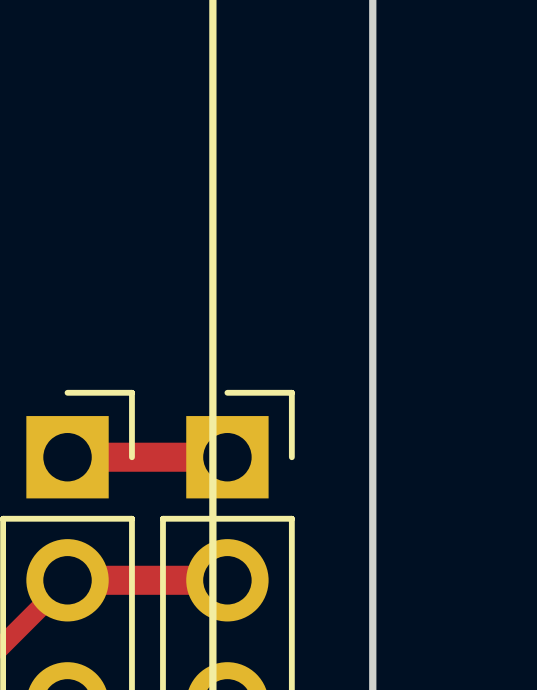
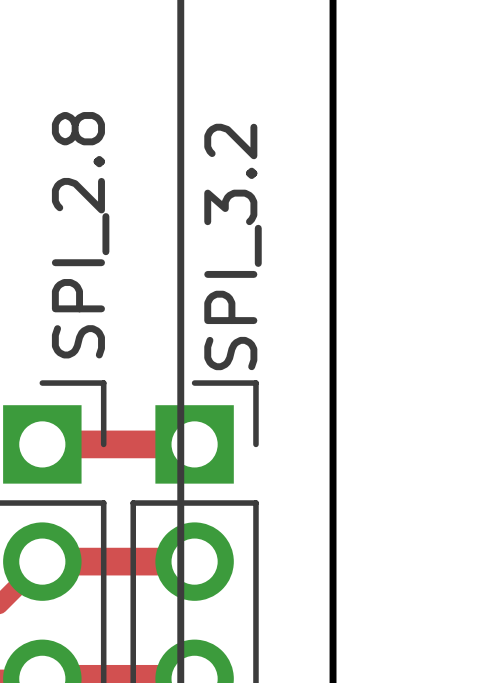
part value: none -> SPI_2.8 (80, 235)
part value: none -> SPI_3.2 (233, 246)

